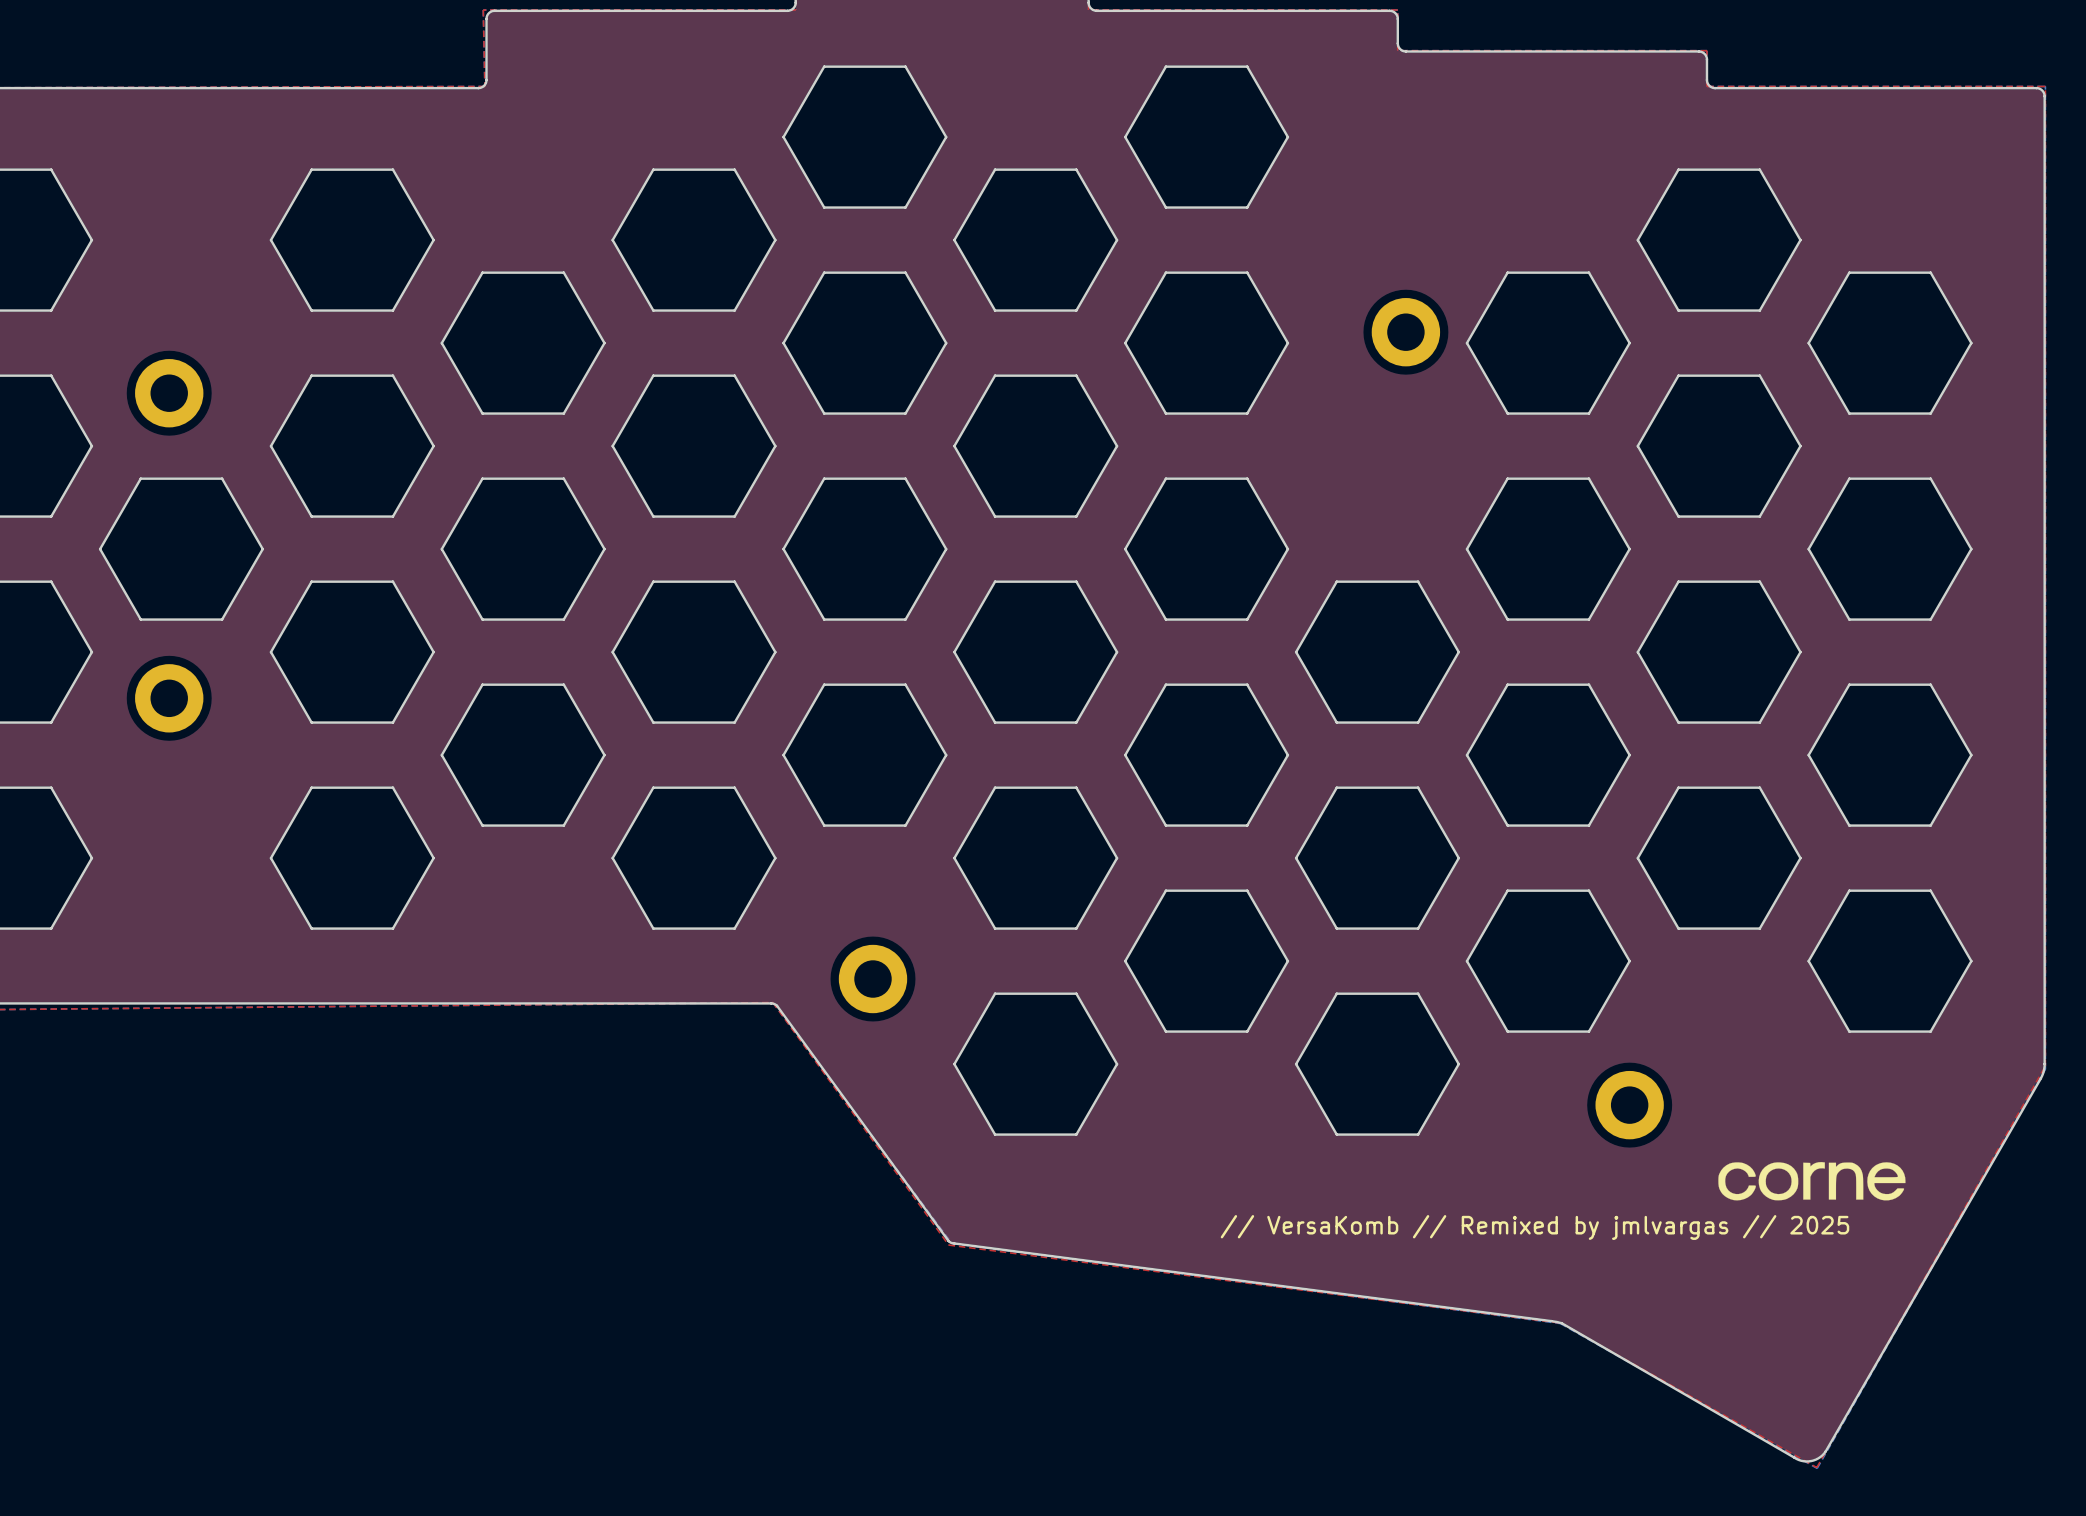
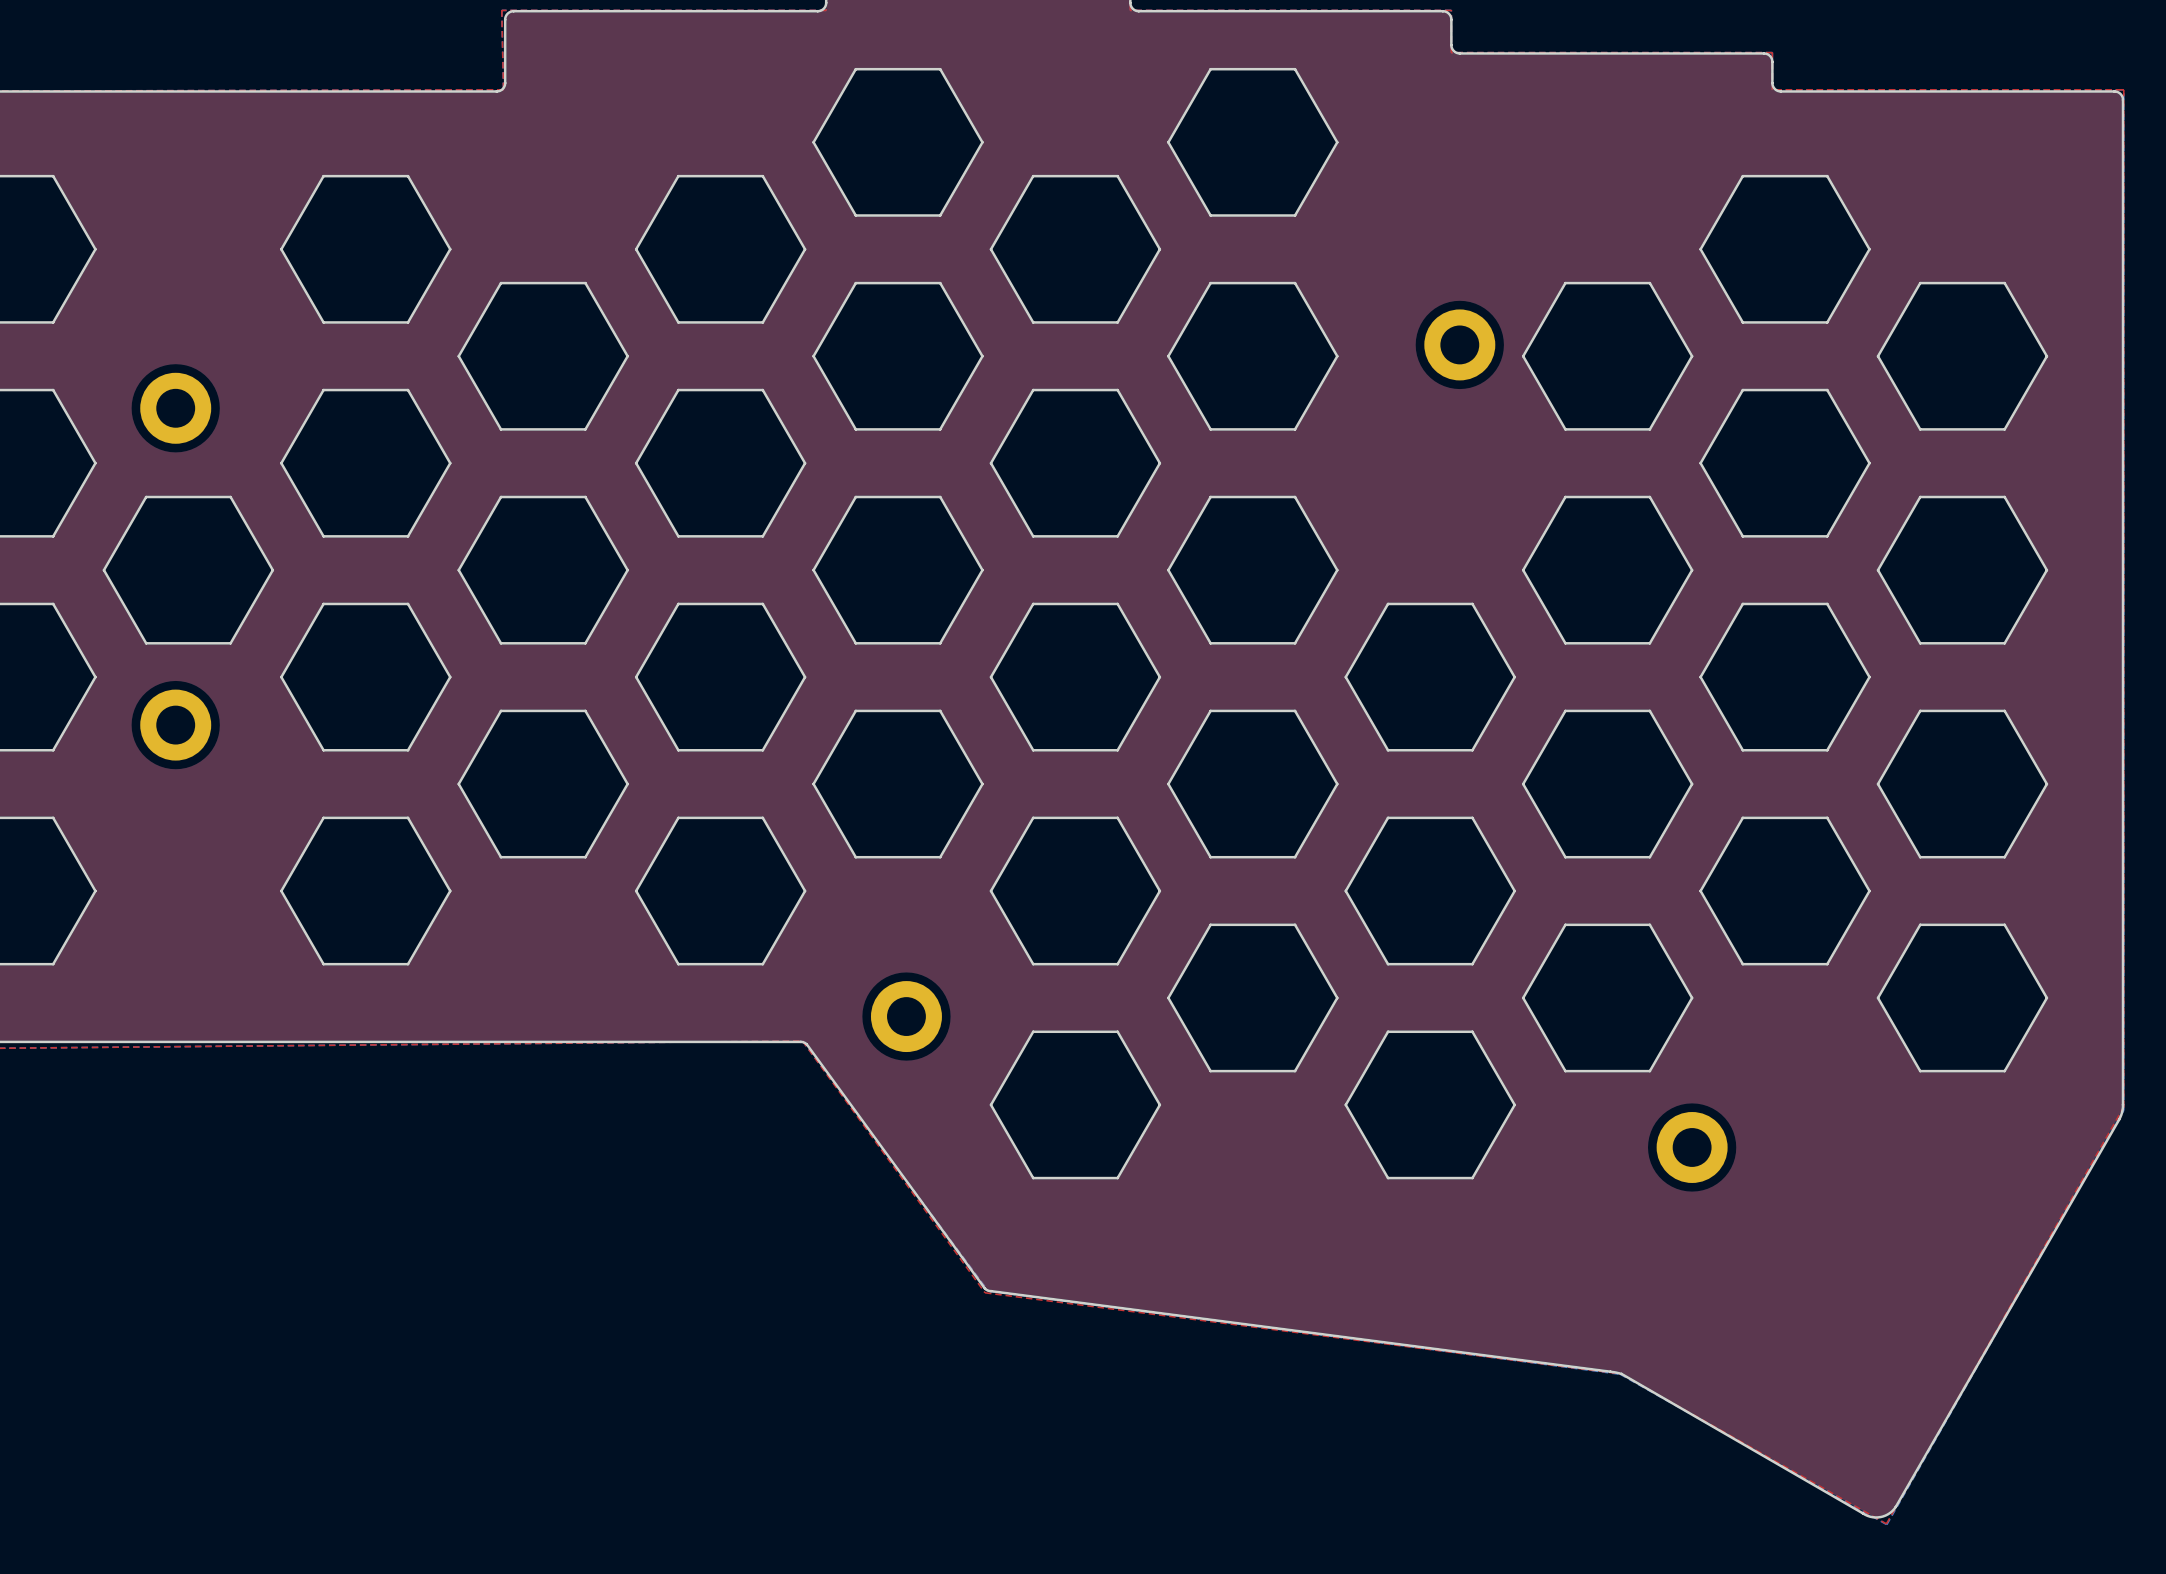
drawing: [1718, 1162, 1906, 1201] -> none
text: // VersaKomb // Remixed by jmlvargas // 2025 (1534, 1227) -> none

